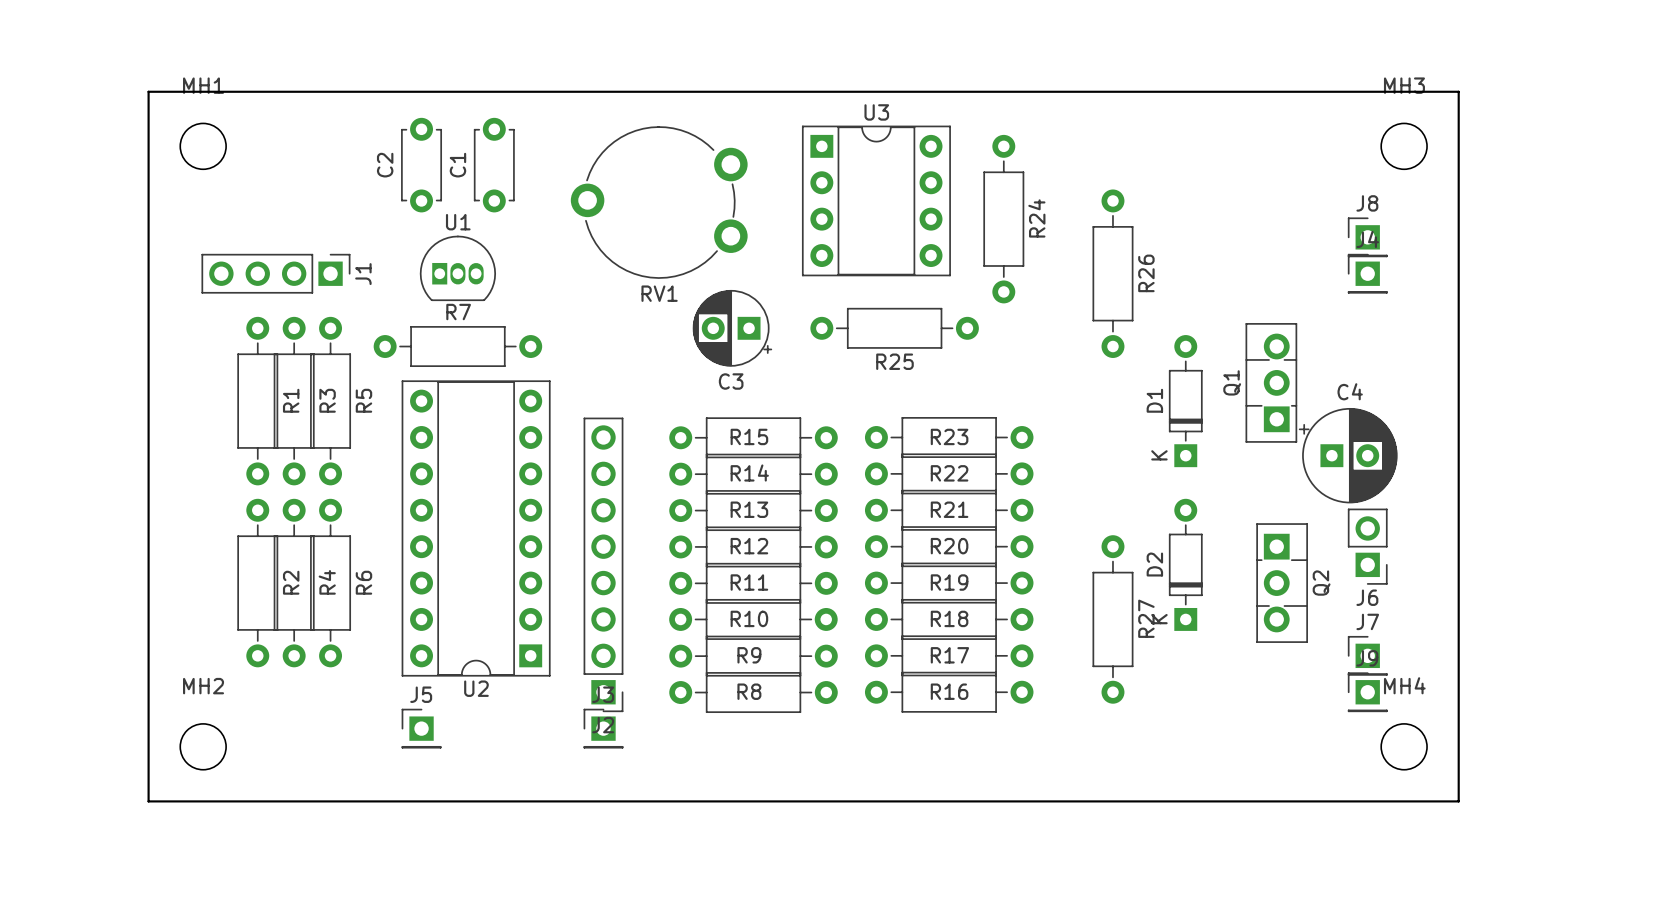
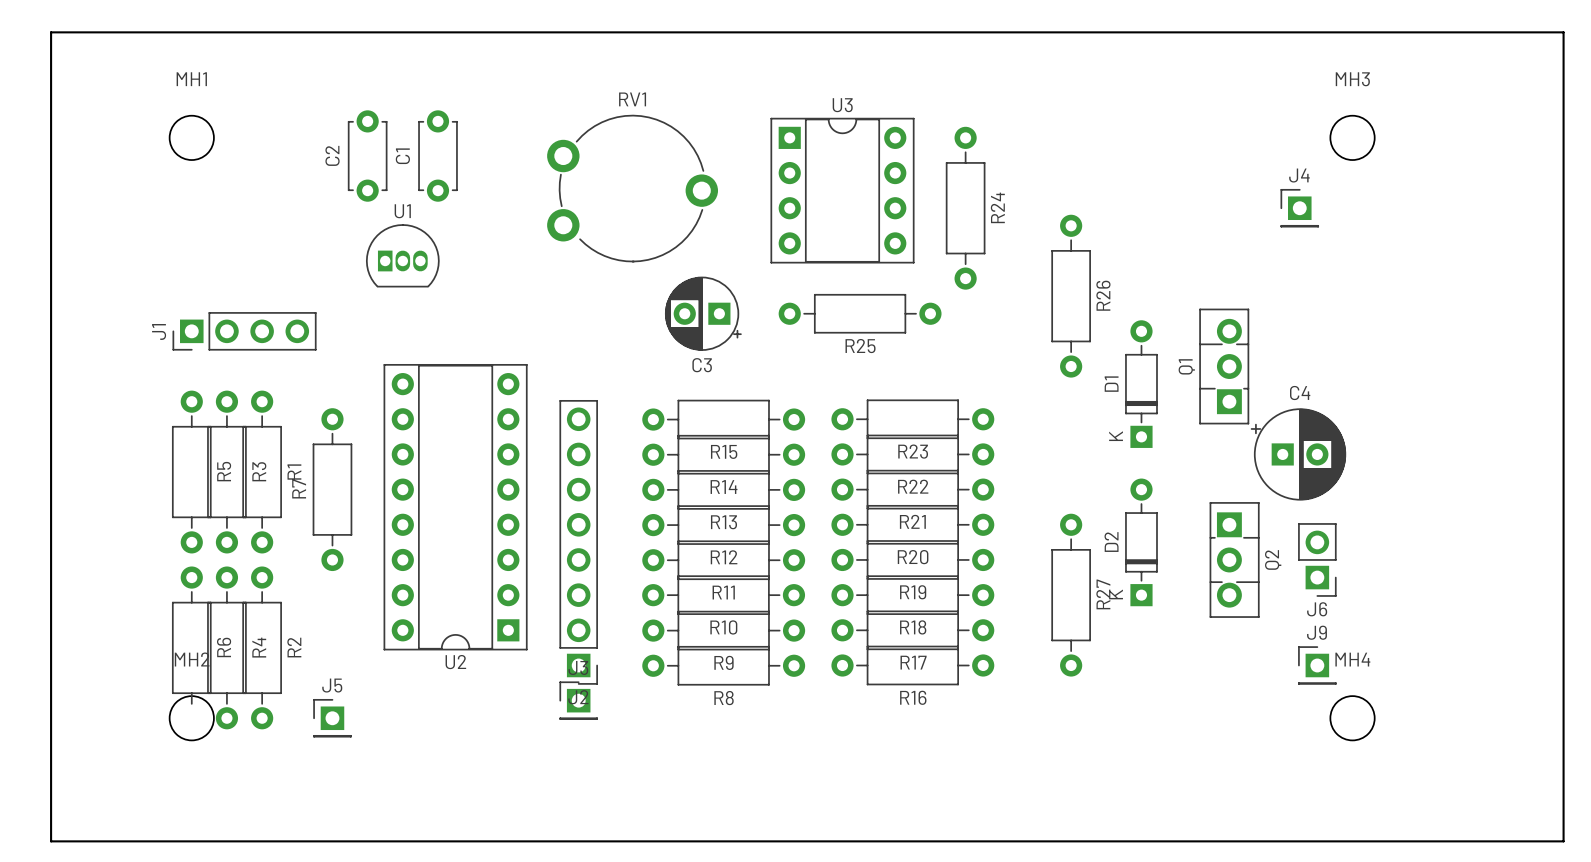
board edge: (148, 91) (148, 801) (1458, 801) (1458, 91) (148, 91) -> (51, 32) (51, 841) (1563, 841) (1563, 32) (51, 32)
C2 position: (421, 165) -> (367, 156)
C1 position: (494, 165) -> (438, 156)
RV1 rotation: 0° (659, 202) -> 180° (632, 188)
J8: (1367, 237) -> none
U1 position: (457, 268) -> (402, 255)
J1 rotation: 0° (275, 273) -> 180° (244, 331)
R26 position: (1112, 273) -> (1071, 296)
J4 position: (1367, 273) -> (1299, 208)
R7 name position: R7 (458, 312) -> R7 (299, 488)
R7 rotation: 0° (457, 346) -> 90° clockwise (332, 489)
R7 position: (457, 346) -> (332, 489)
R1 position: (257, 401) -> (262, 472)
R3 position: (294, 401) -> (226, 472)
R5 position: (330, 401) -> (191, 472)
R15 name position: R15 (749, 436) -> R15 (724, 451)
R23 name position: R23 (949, 436) -> R23 (913, 451)
C4 position: (1348, 455) -> (1298, 454)
R14 name position: R14 (749, 473) -> R14 (724, 487)
R22 name position: R22 (949, 473) -> R22 (913, 486)
R13 name position: R13 (749, 509) -> R13 (723, 522)
R21 name position: R21 (949, 509) -> R21 (912, 521)
R12 name position: R12 (749, 546) -> R12 (724, 557)
R20 name position: R20 (949, 546) -> R20 (913, 557)
J6 position: (1367, 546) -> (1317, 559)
R11 name position: R11 (749, 582) -> R11 (723, 592)
R19 name position: R19 (949, 582) -> R19 (913, 592)
R2 position: (257, 583) -> (262, 647)
R4 position: (294, 583) -> (226, 647)
R6 position: (330, 583) -> (191, 647)
R10 name position: R10 (749, 618) -> R10 (723, 627)
R18 name position: R18 (949, 618) -> R18 (913, 627)
R9 name position: R9 (749, 655) -> R9 (723, 662)
R17 name position: R17 (949, 655) -> R17 (913, 662)
J7: (1367, 655) -> none
R8 name position: R8 (749, 691) -> R8 (724, 698)
R16 name position: R16 (949, 691) -> R16 (913, 697)
J5 position: (421, 728) -> (332, 718)

